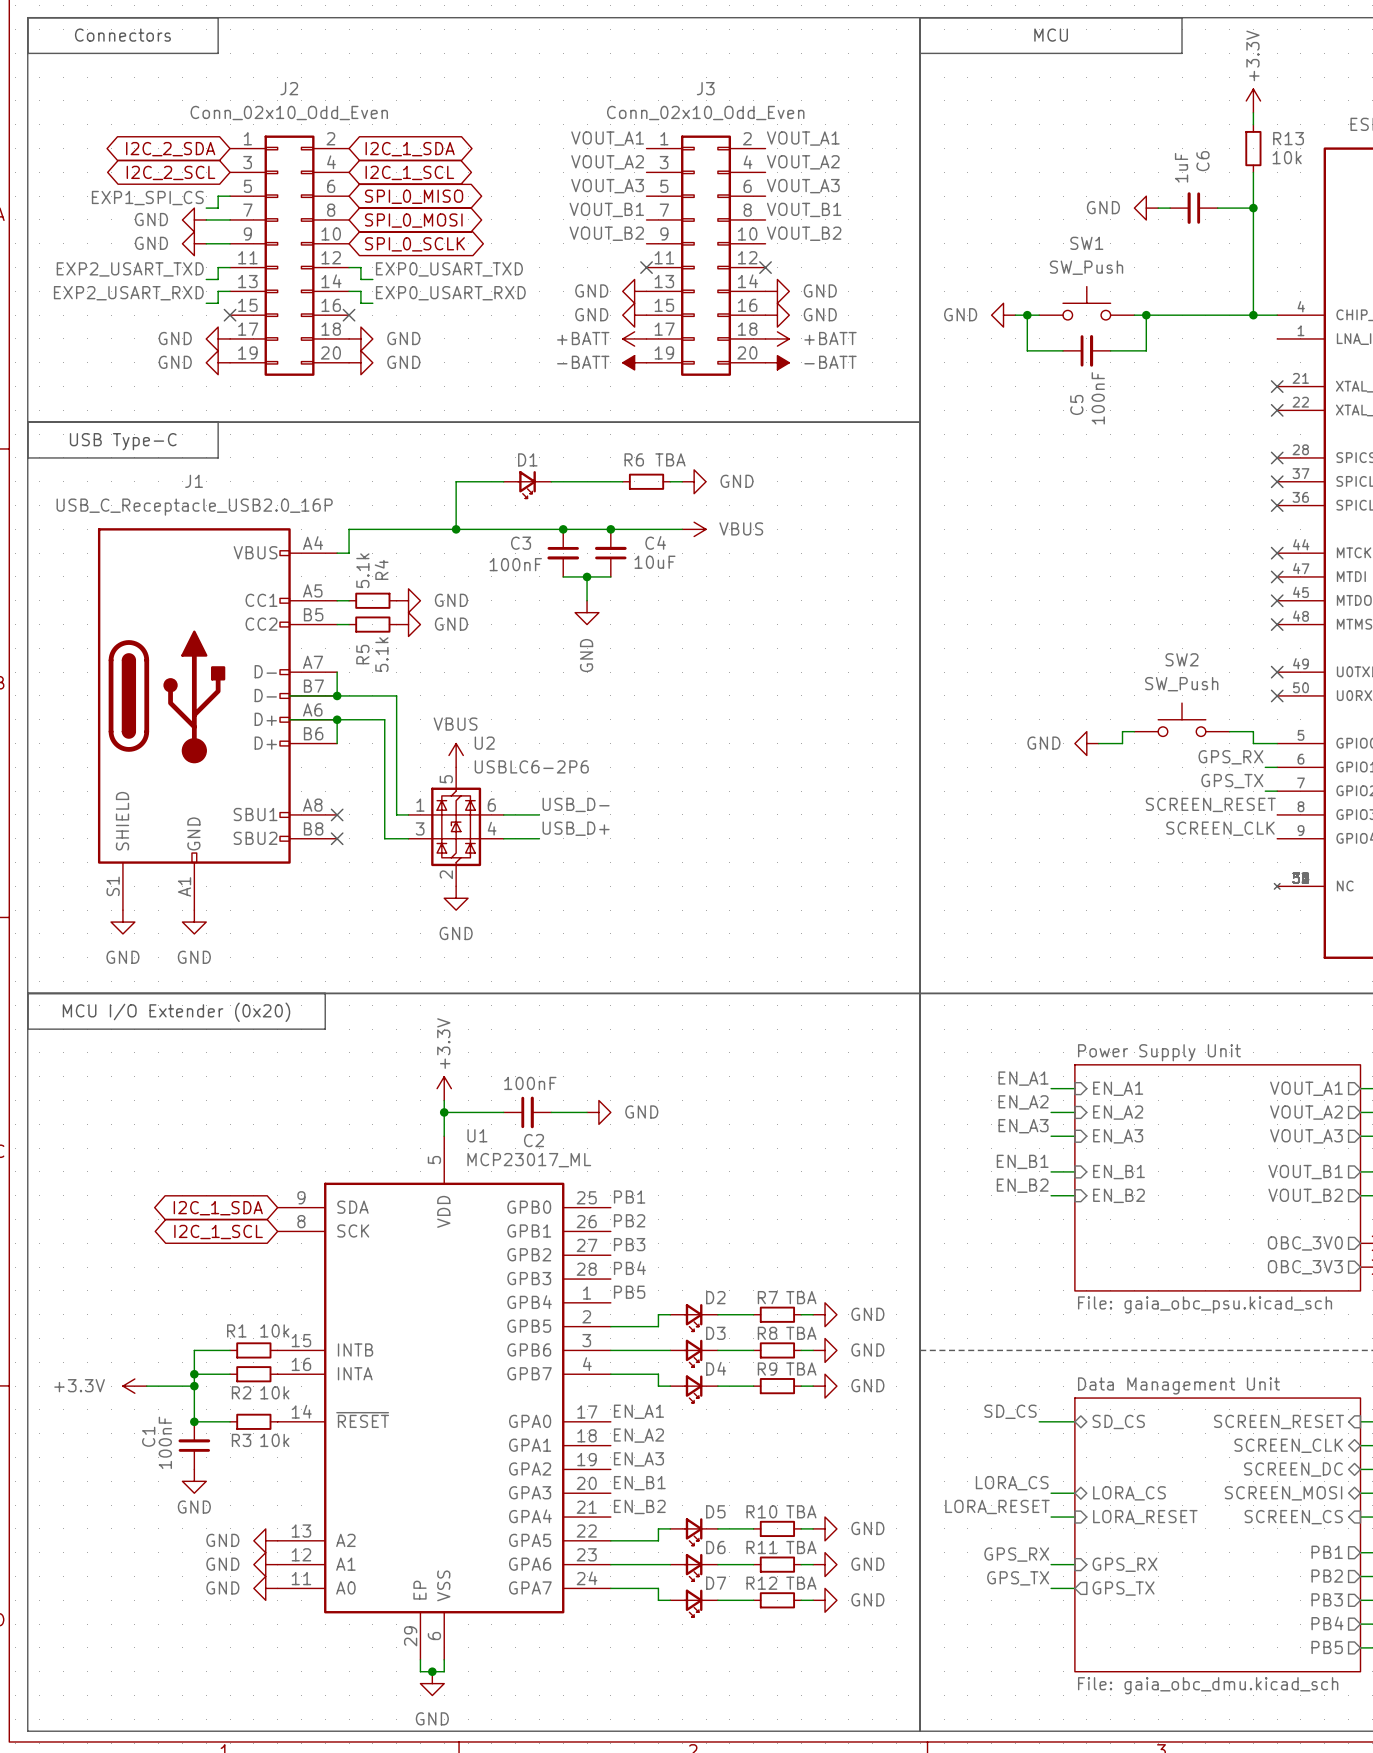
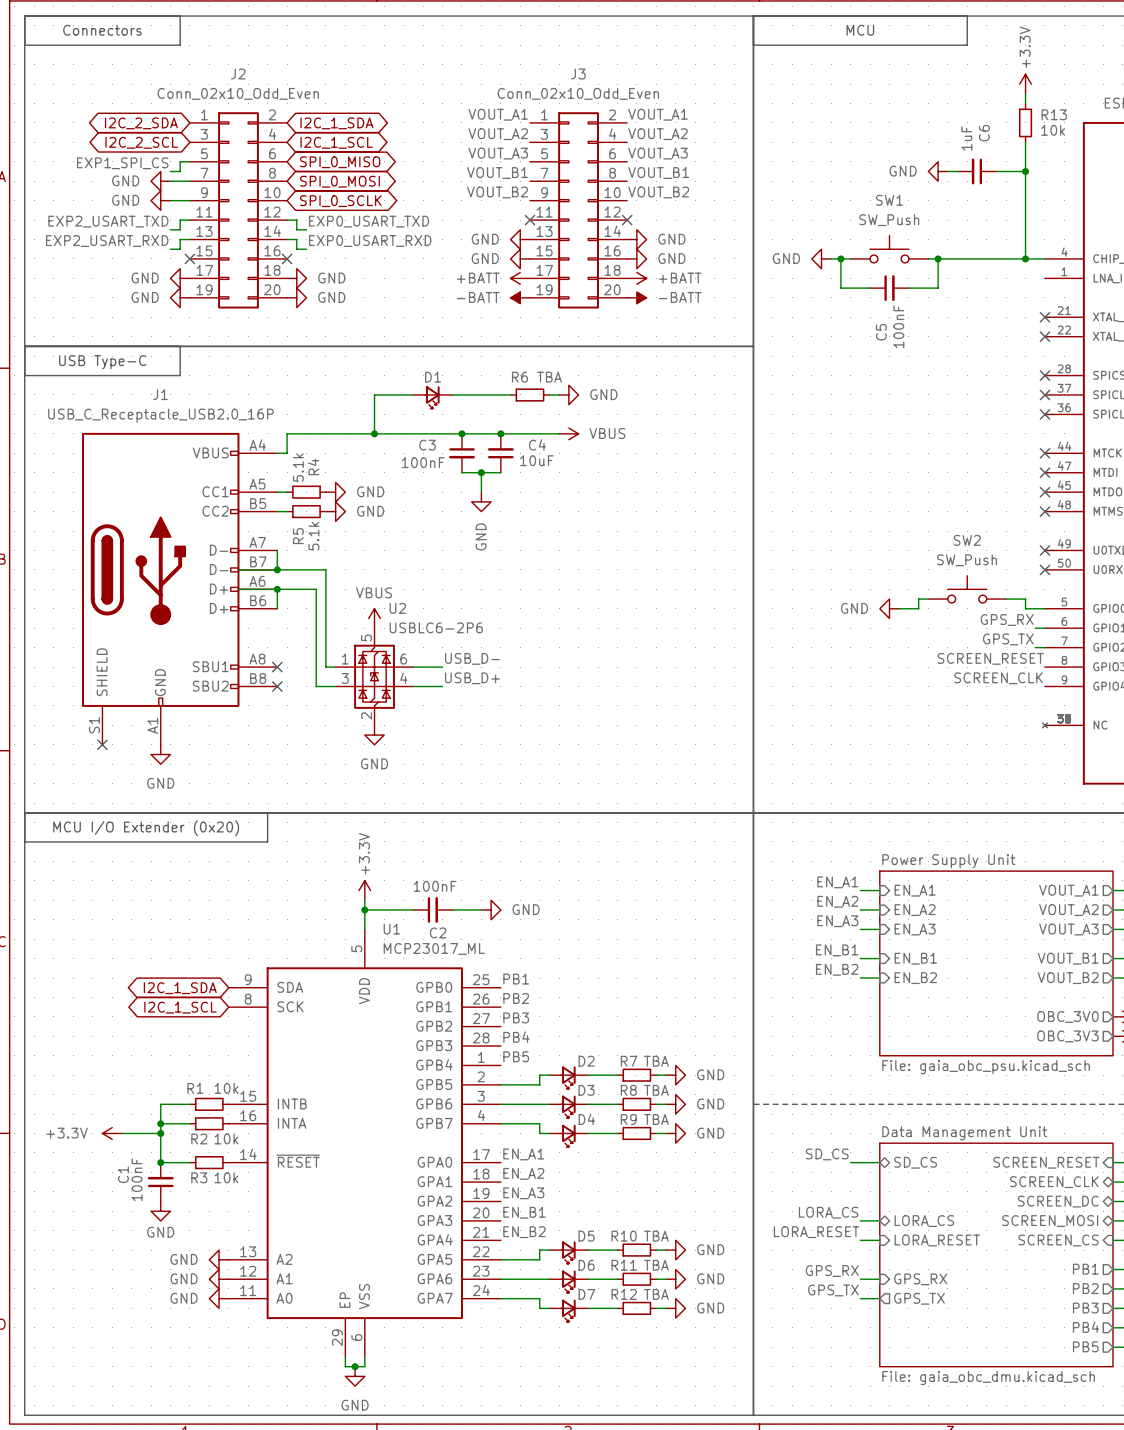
no-connect mark: none -> (102, 744)
power symbol: GND (122, 922) -> none

